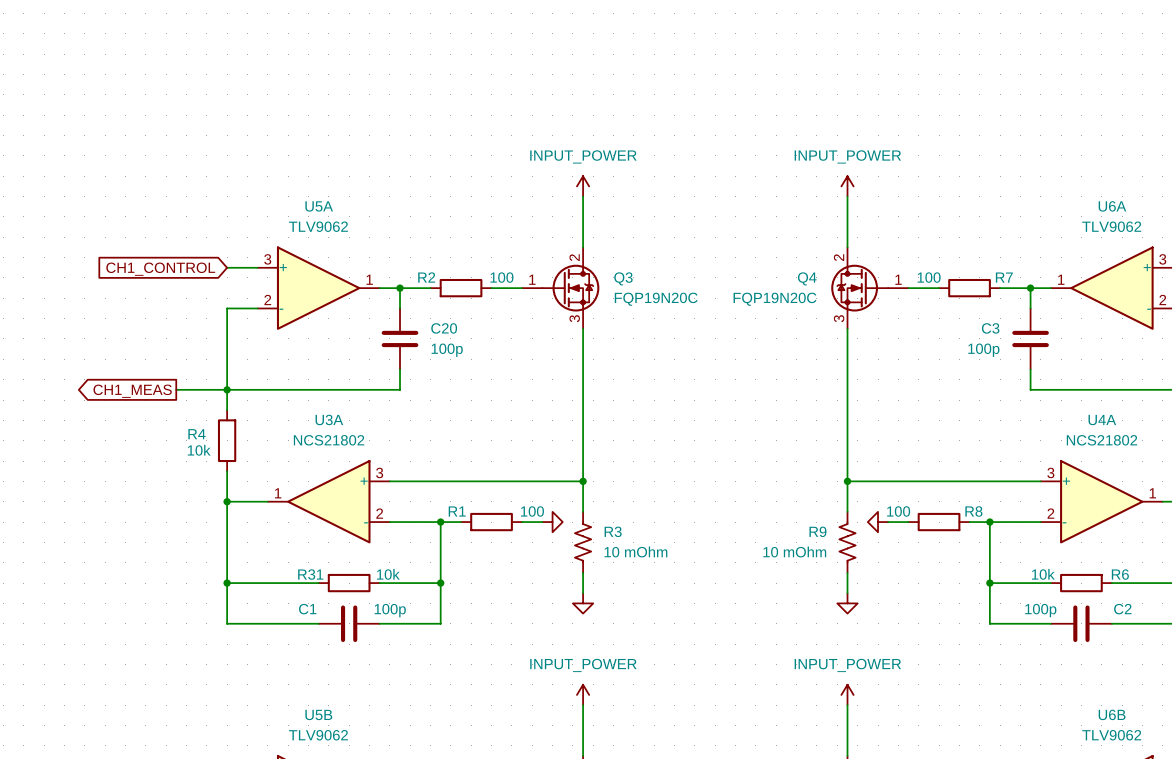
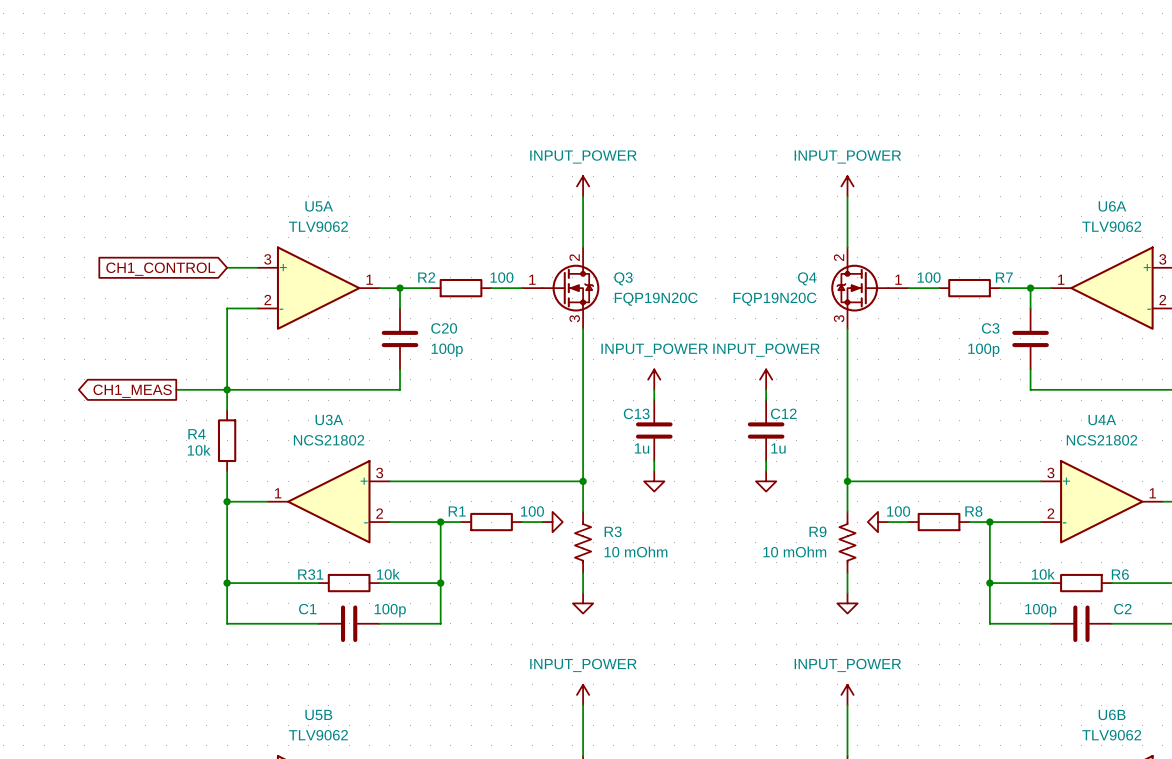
power symbol: none -> INPUT_POWER (654, 379)
power symbol: none -> INPUT_POWER (766, 379)
wire: none -> (654, 389) (654, 400)
wire: none -> (766, 389) (766, 400)
C13: none -> 1u (654, 430)
C12: none -> 1u (766, 430)
wire: none -> (654, 461) (654, 471)
wire: none -> (766, 461) (766, 471)
power symbol: none -> (654, 481)
power symbol: none -> (766, 481)

